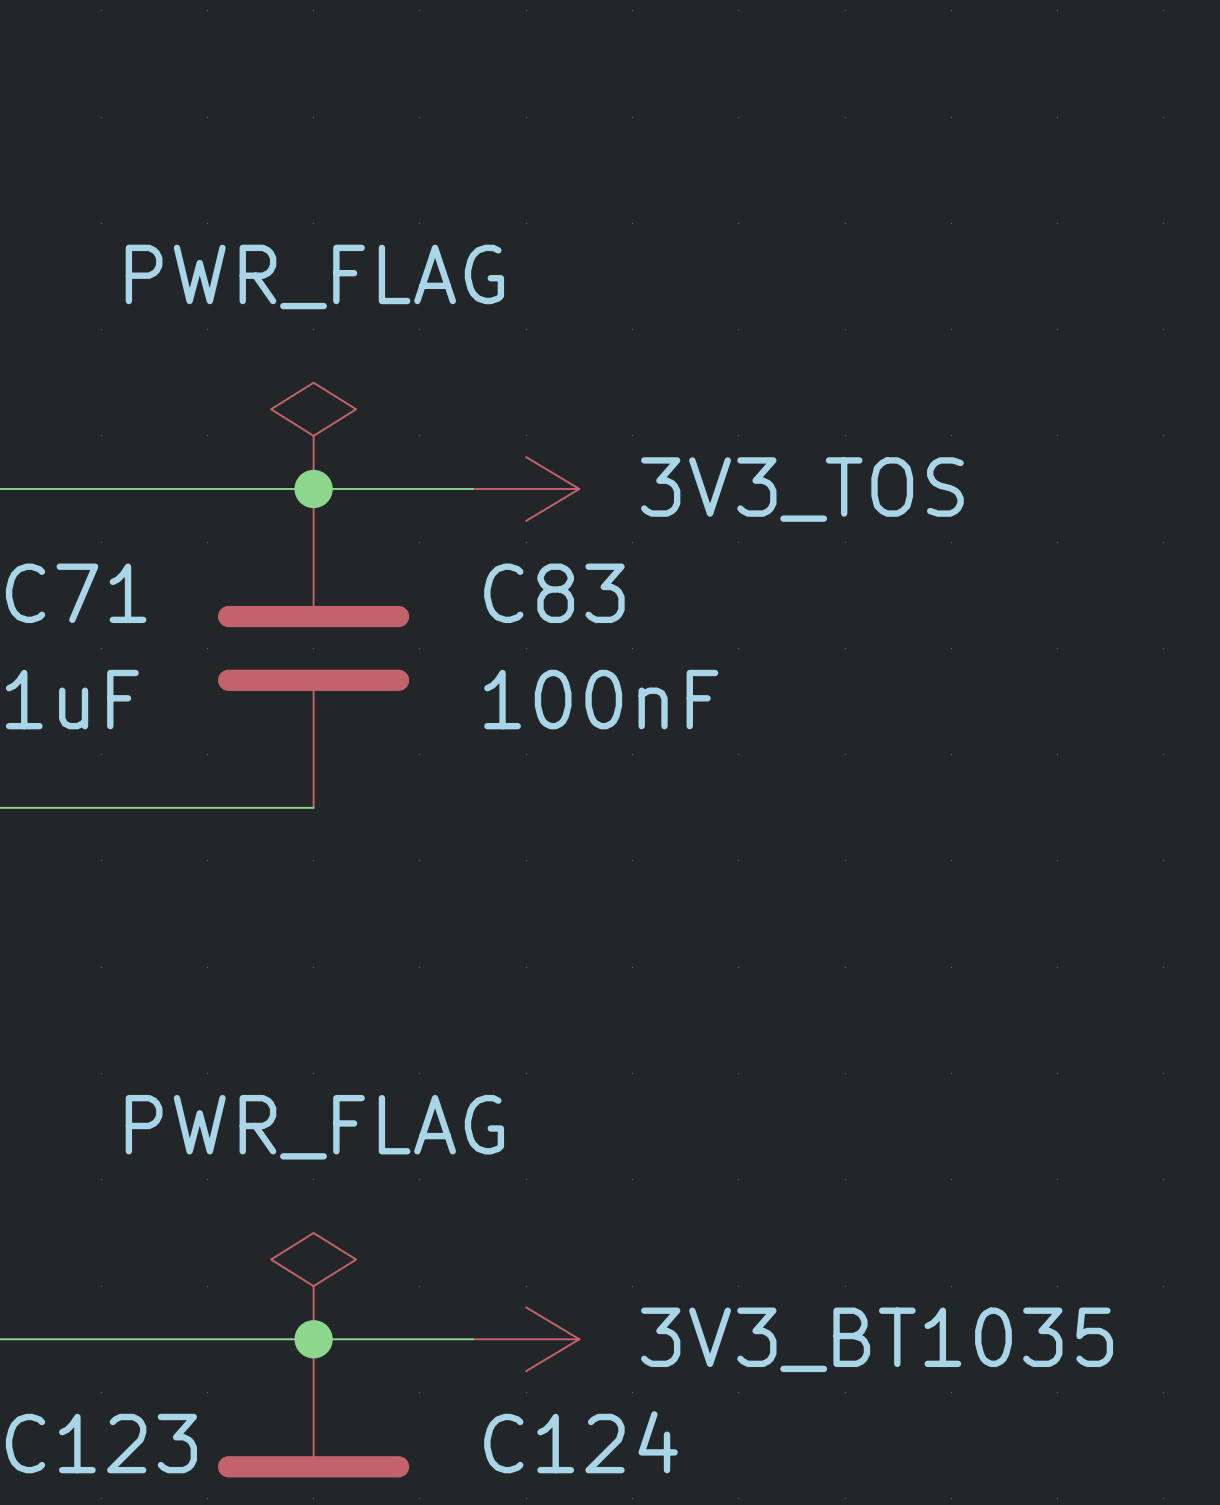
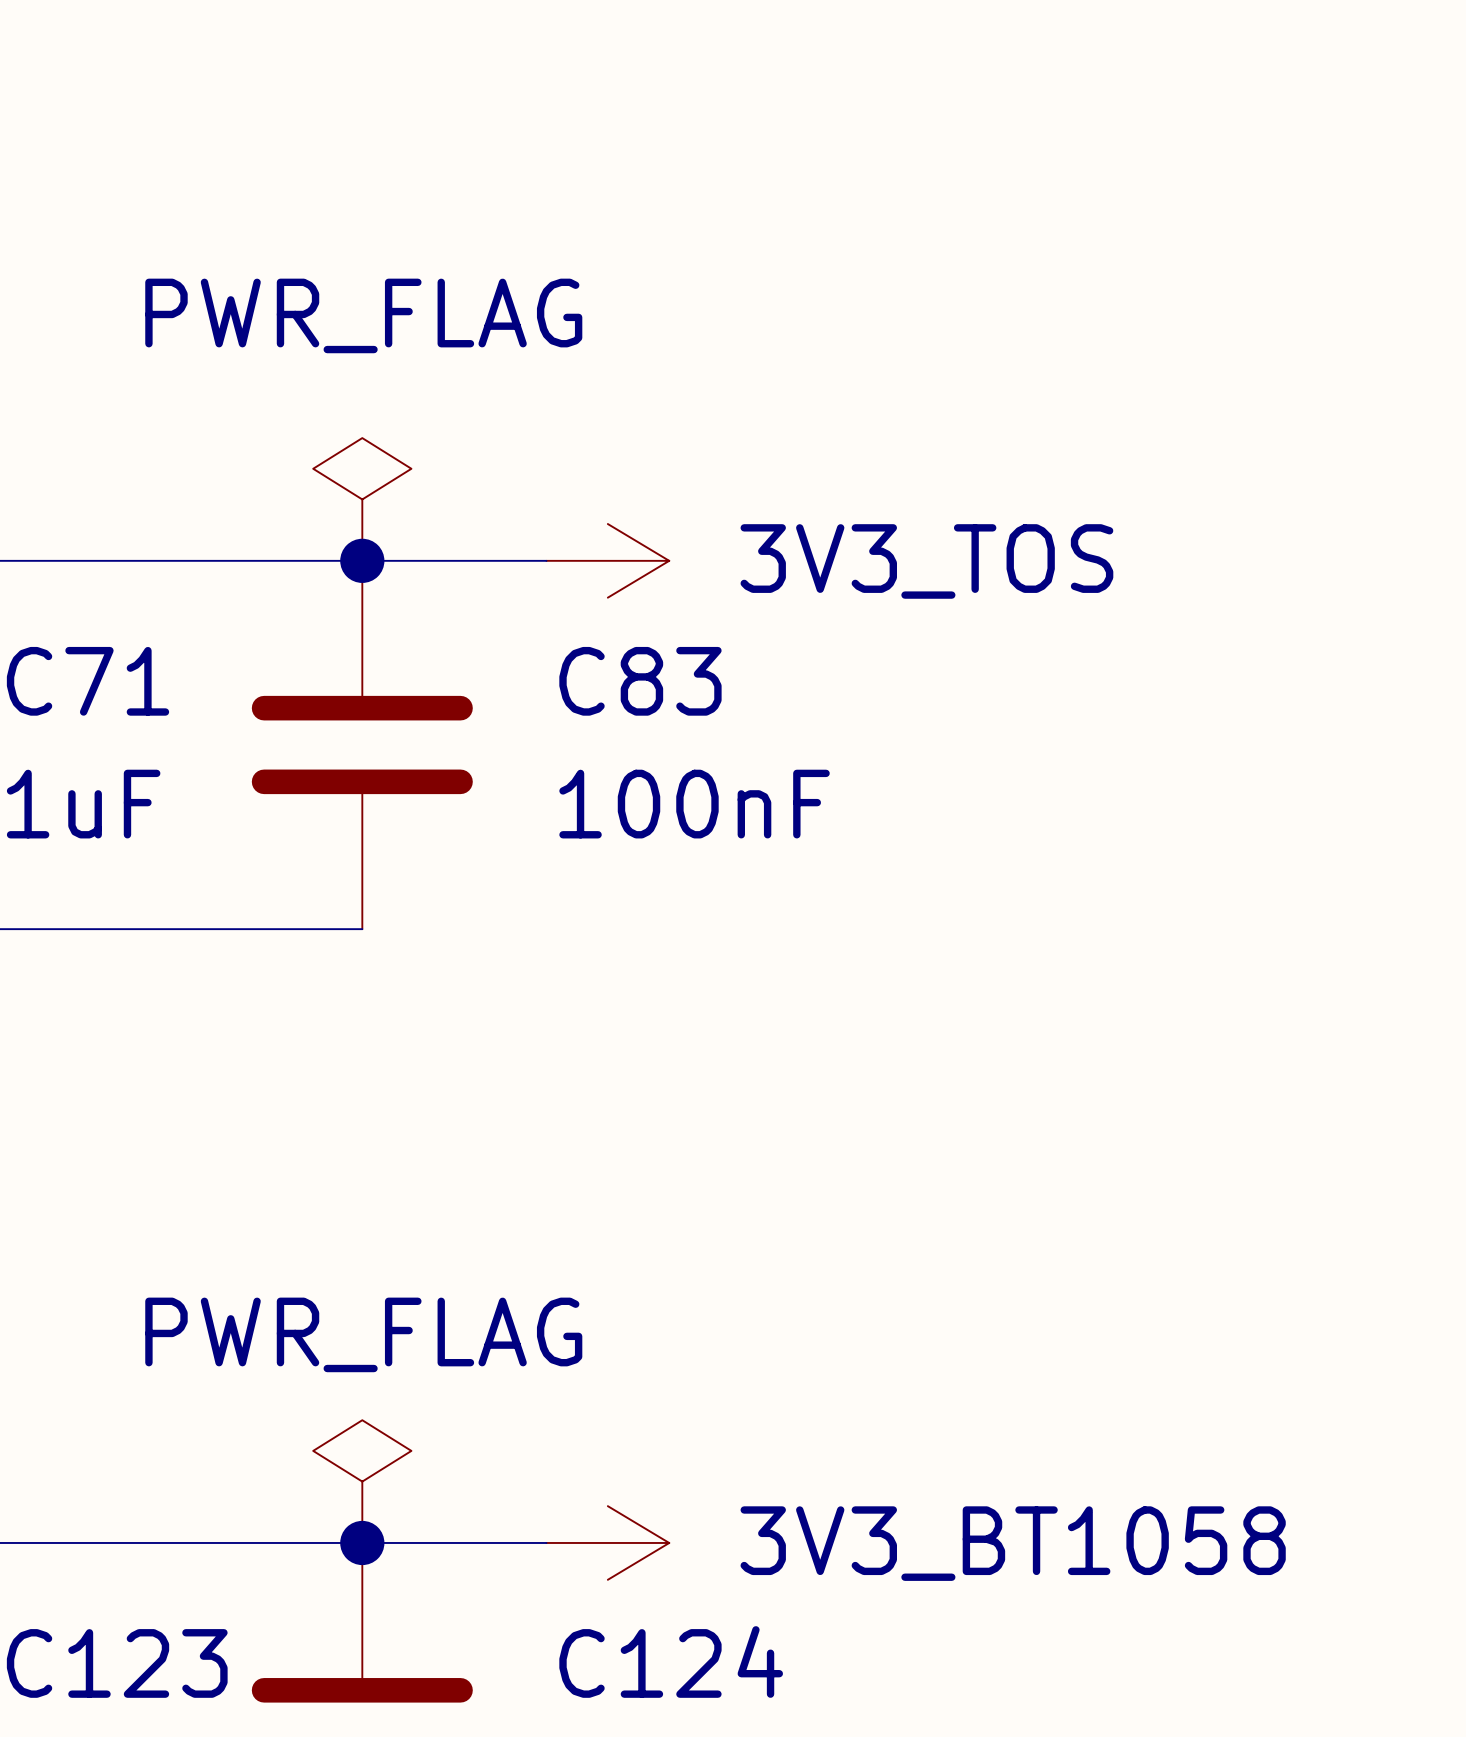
power symbol text position: PWR_FLAG (314, 1127) -> PWR_FLAG (363, 1334)
power symbol: 3V3_BT1035 (526, 1339) -> 3V3_BT1058 (607, 1542)

